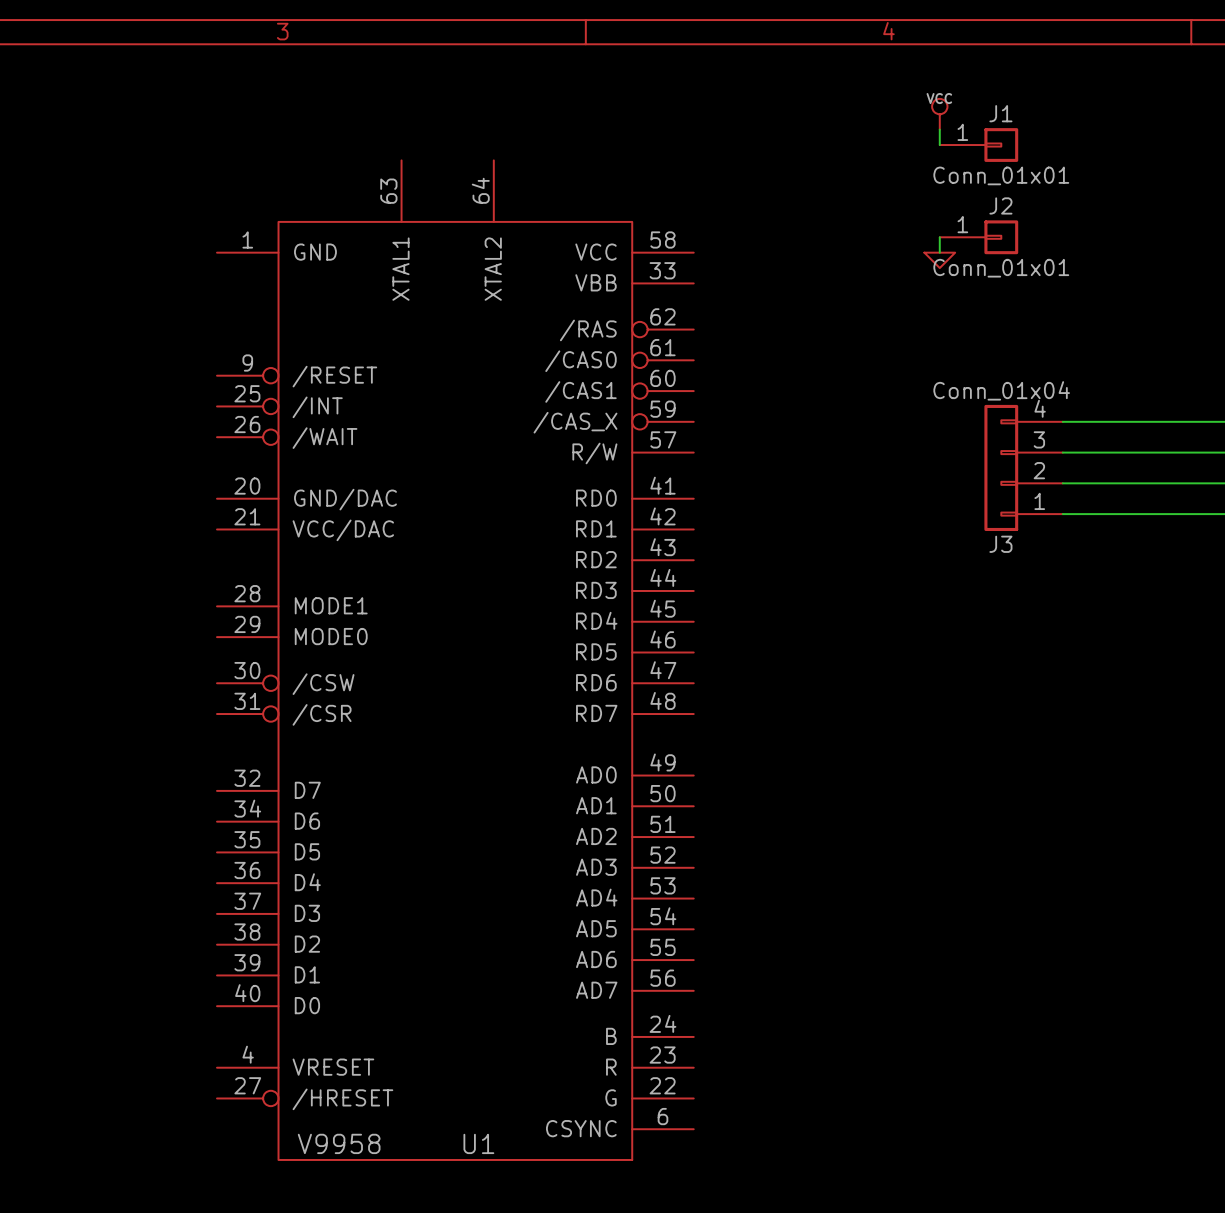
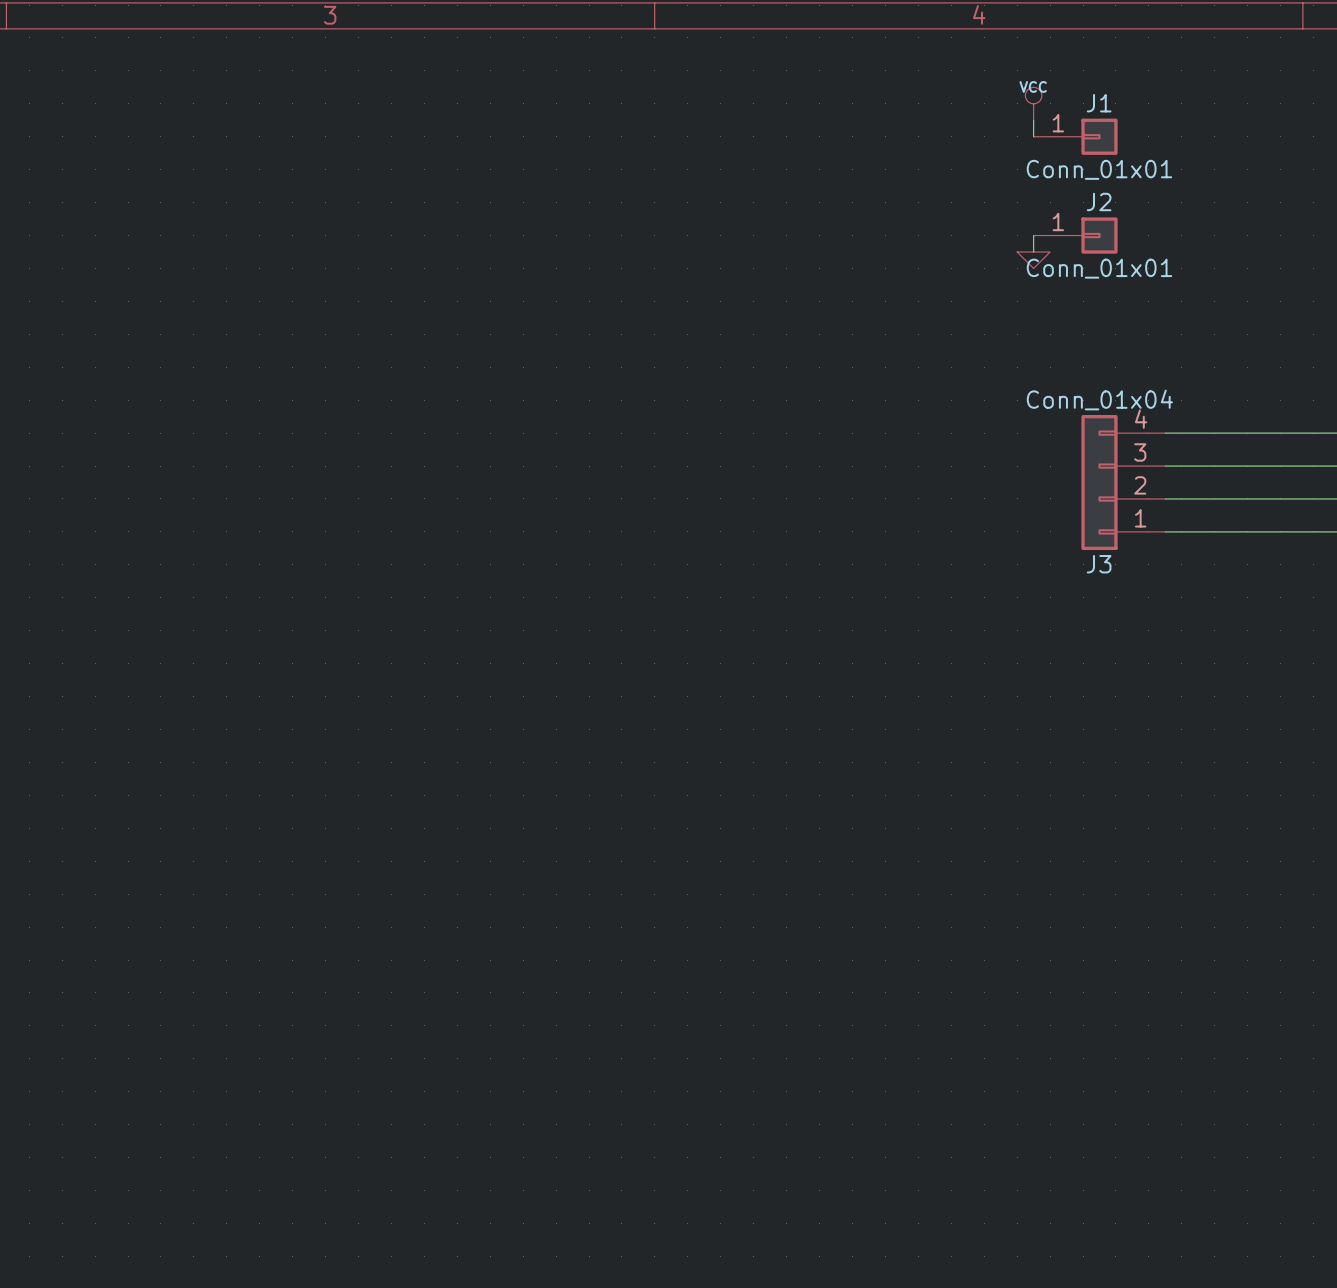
U1: V9958 (455, 660) -> none

